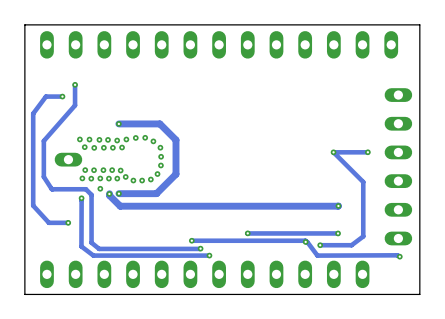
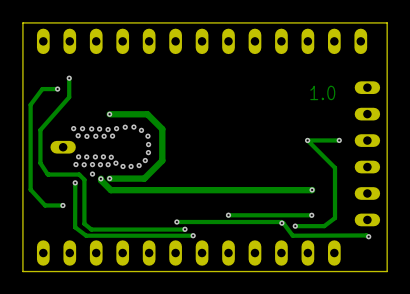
text: none -> 1.0 (322, 92)

